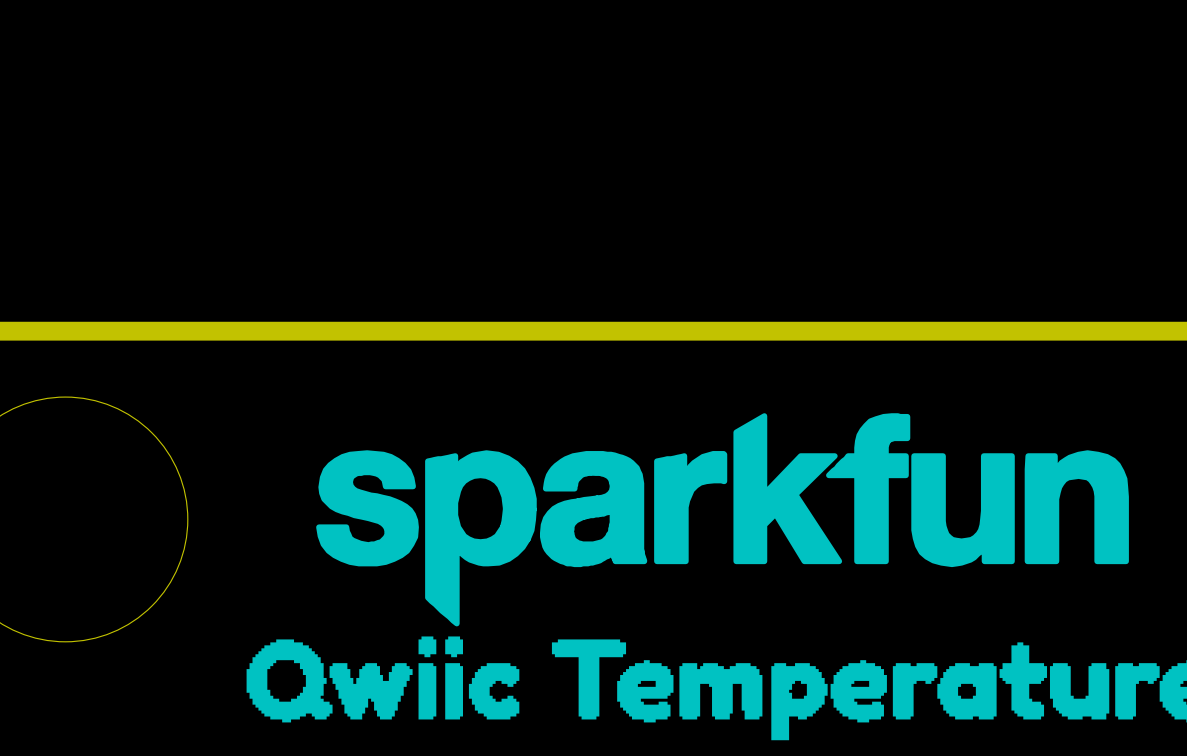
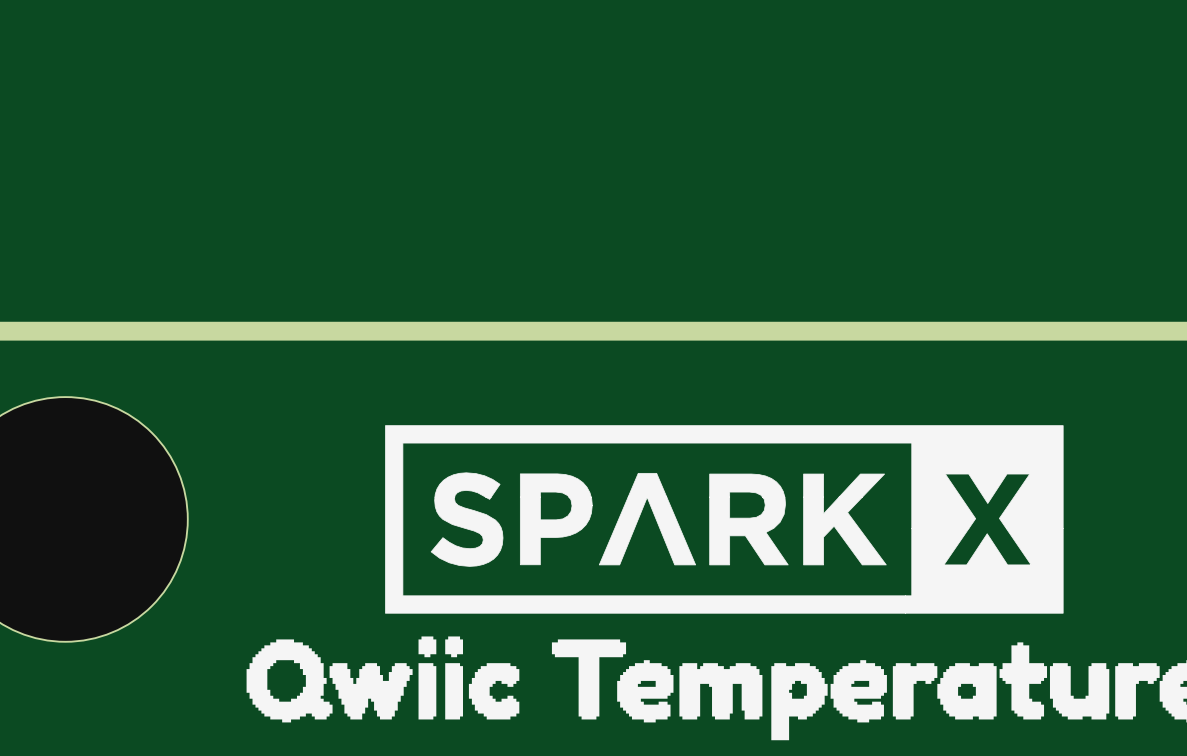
drawing shape: [316, 413, 1129, 627] -> [385, 425, 1064, 614]

